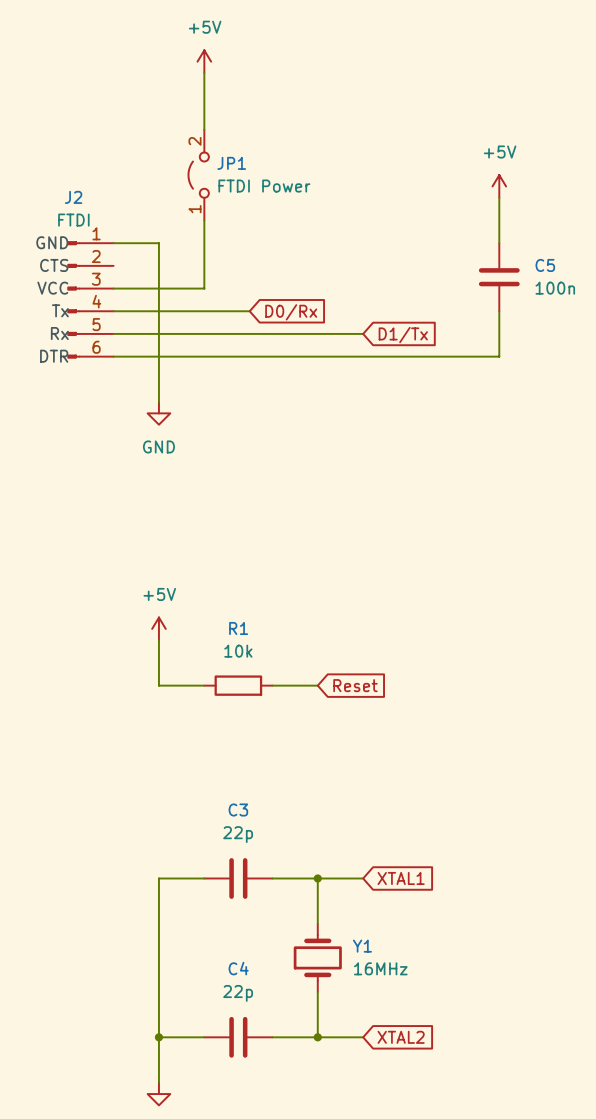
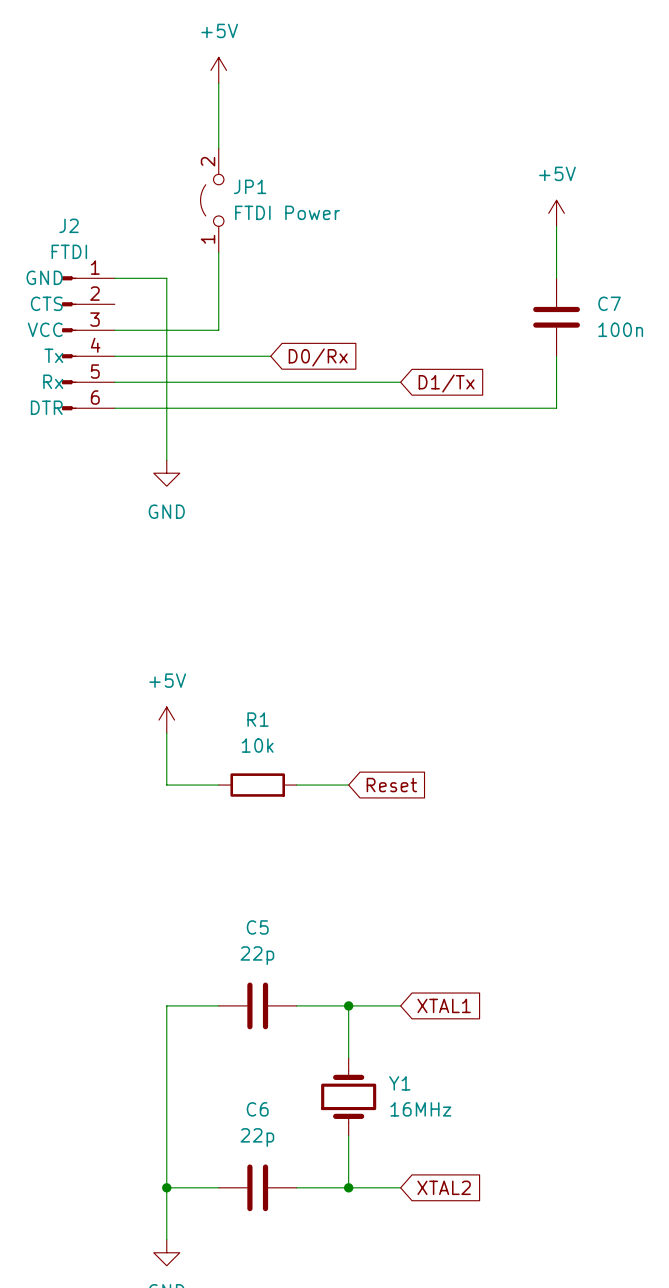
C5 name: C5 (545, 265) -> C7 (609, 303)
C3 name: C3 (238, 810) -> C5 (257, 927)
C4 name: C4 (238, 968) -> C6 (257, 1109)

